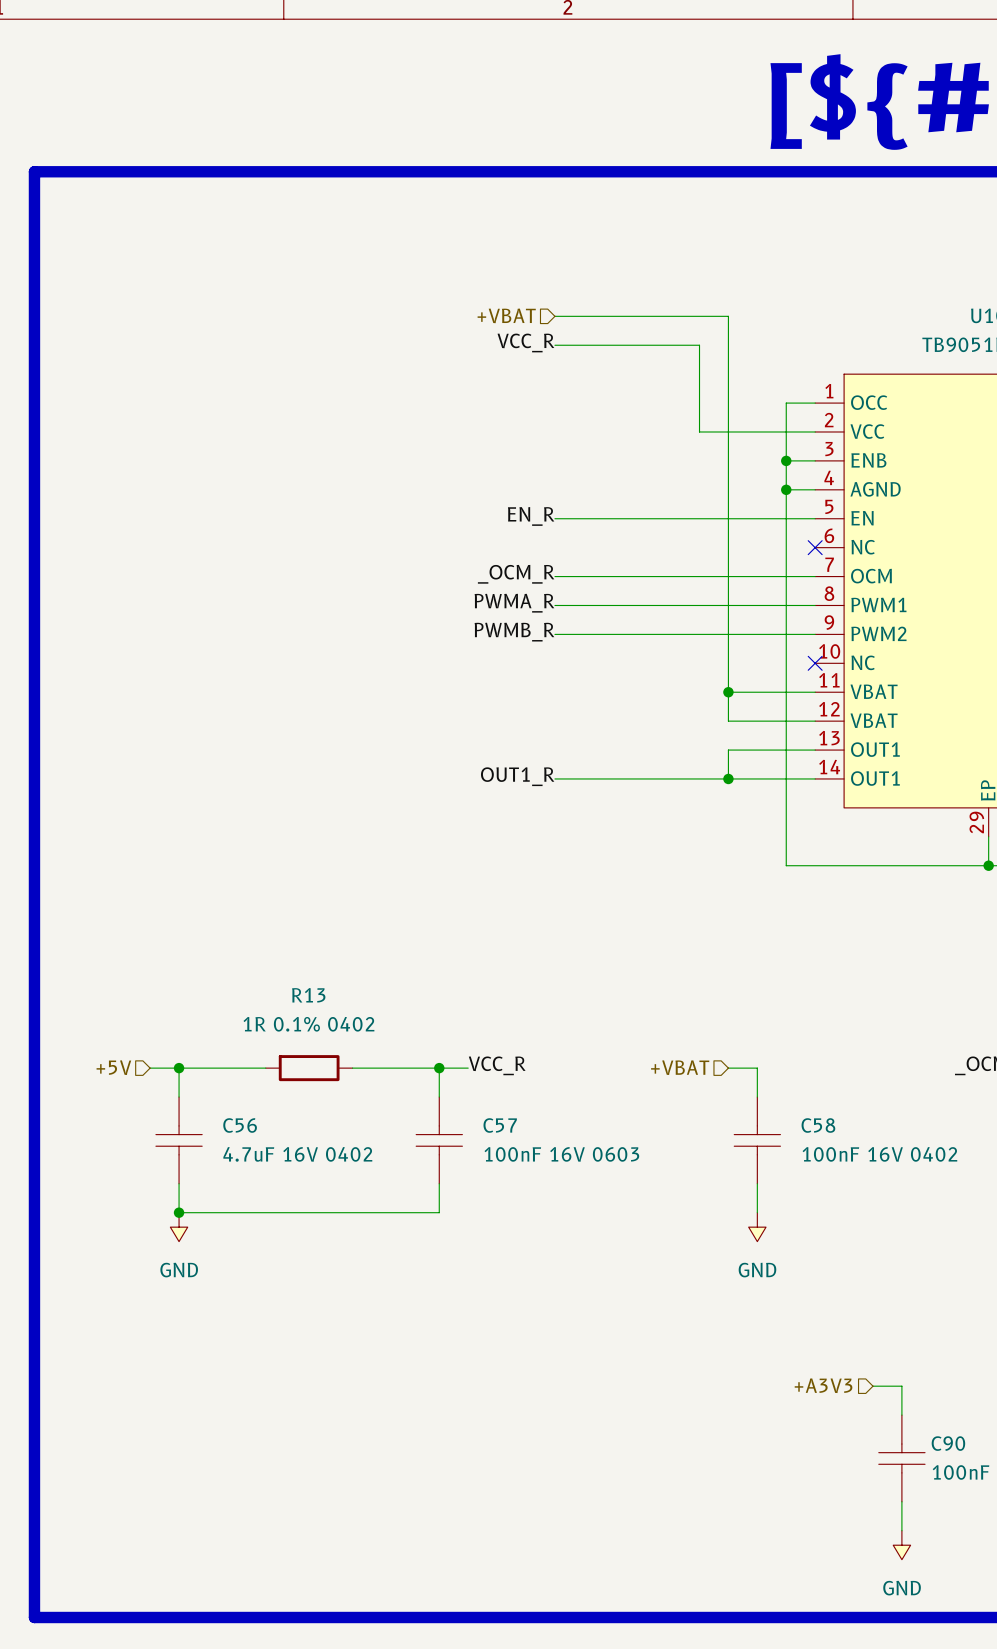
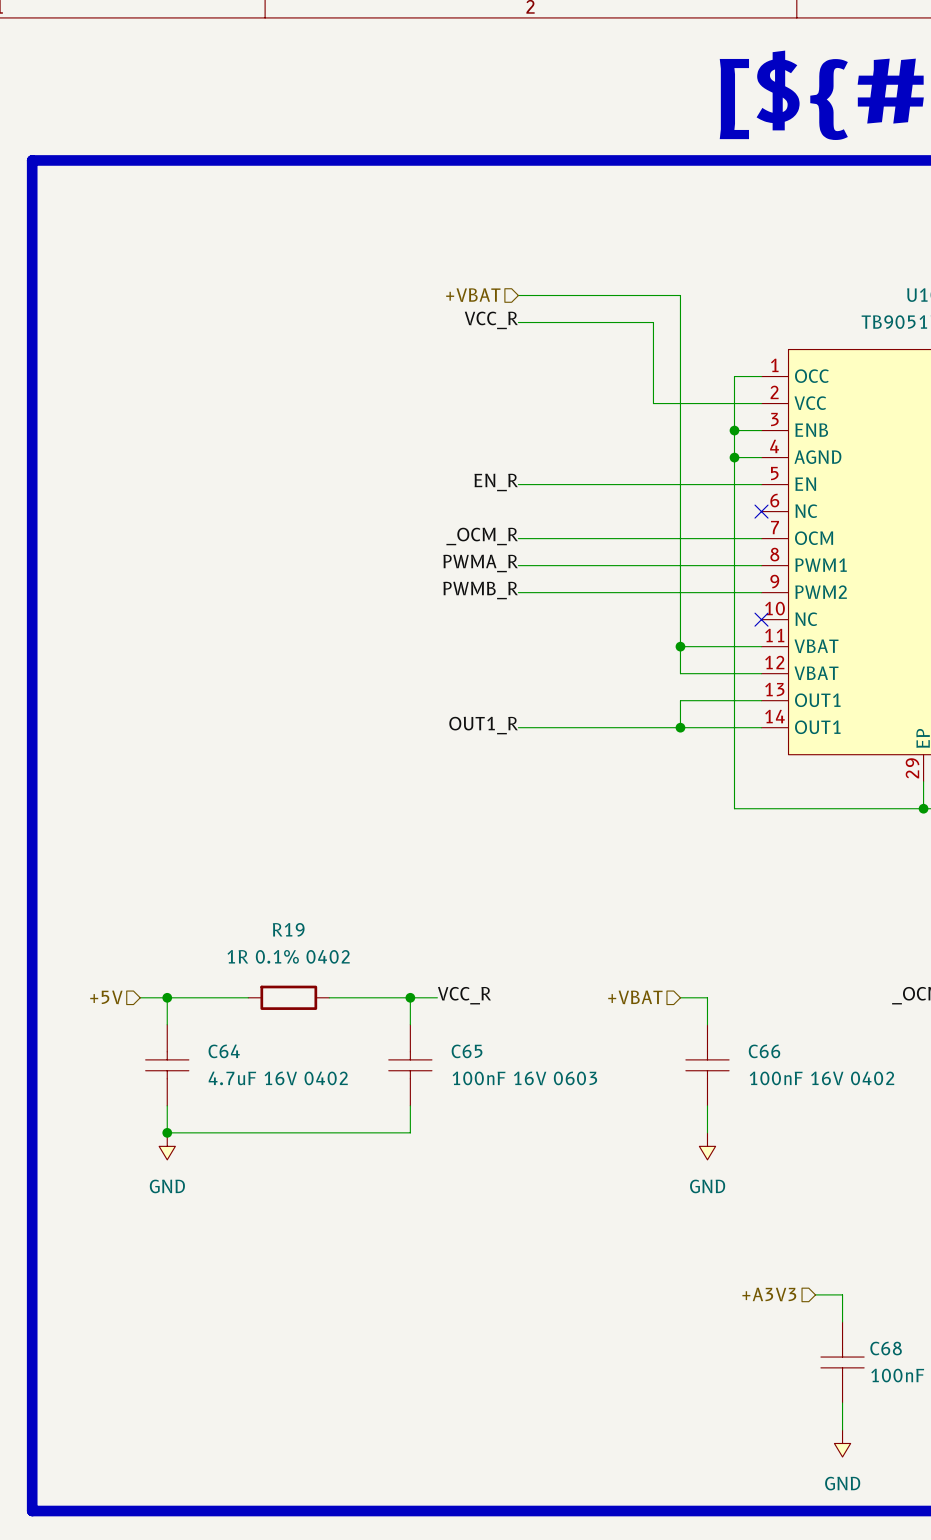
R13 name: R13 (308, 995) -> R19 (288, 929)
C56 name: C56 (240, 1125) -> C64 (224, 1051)
C57 name: C57 (500, 1125) -> C65 (467, 1051)
C58 name: C58 (818, 1125) -> C66 (764, 1051)
C90 name: C90 (948, 1443) -> C68 (886, 1348)

